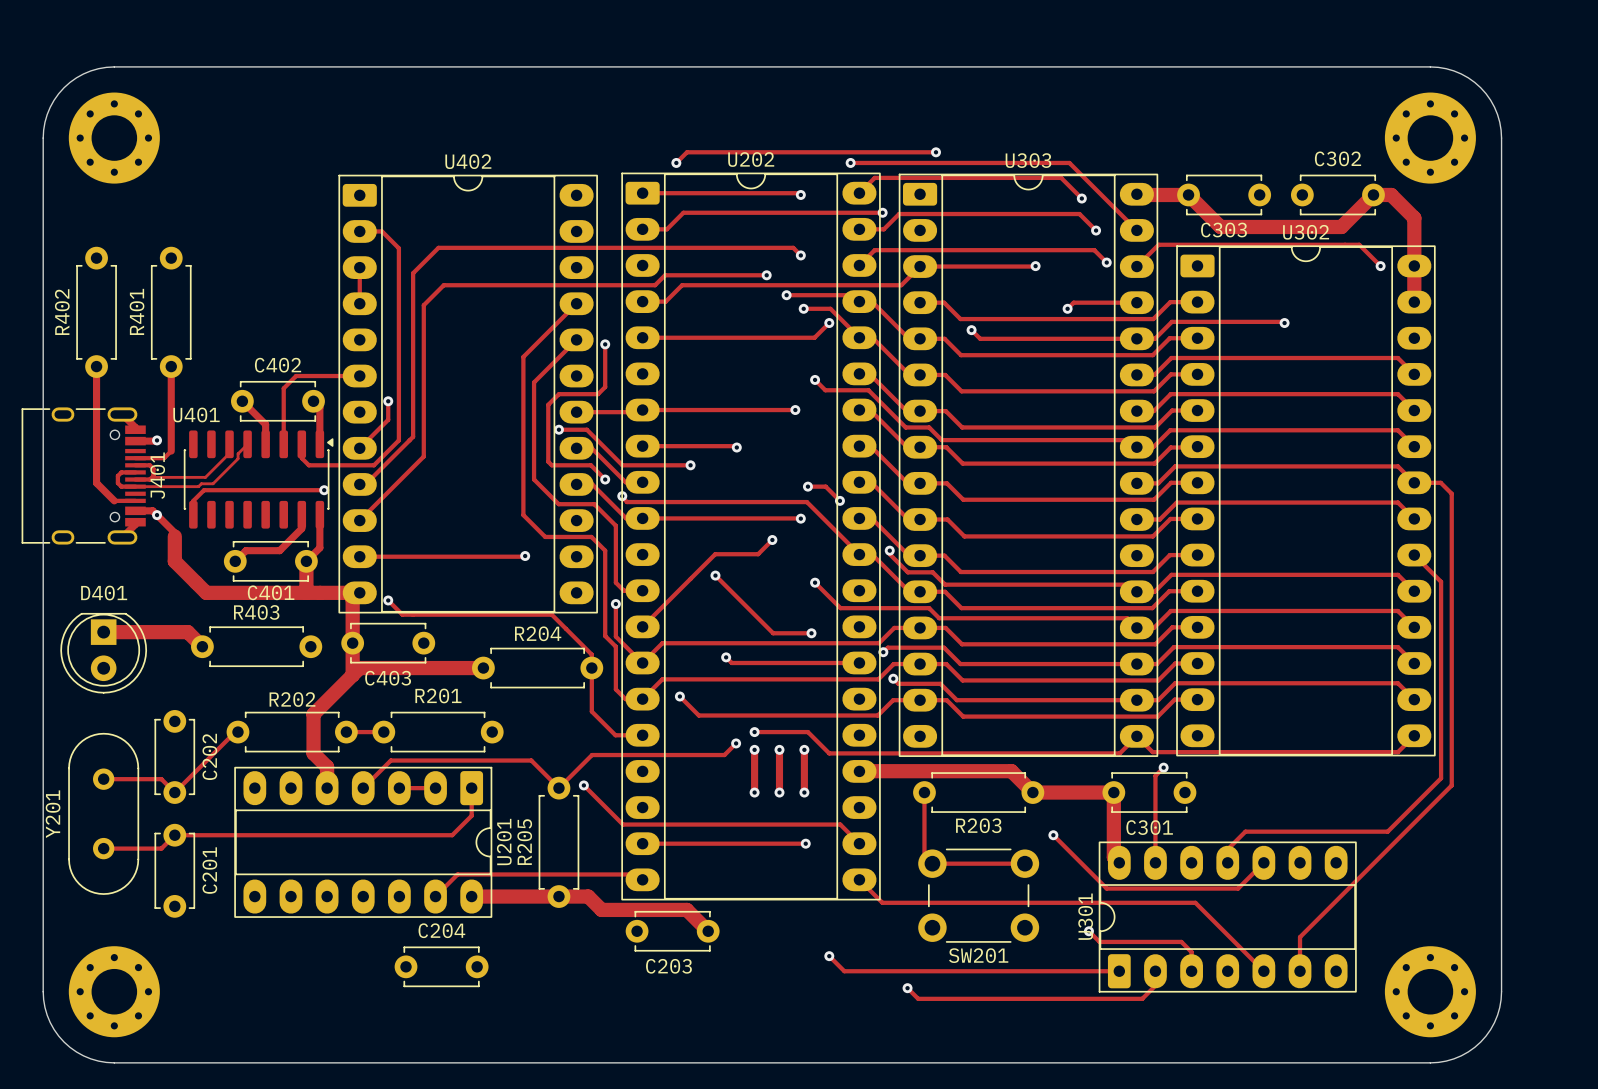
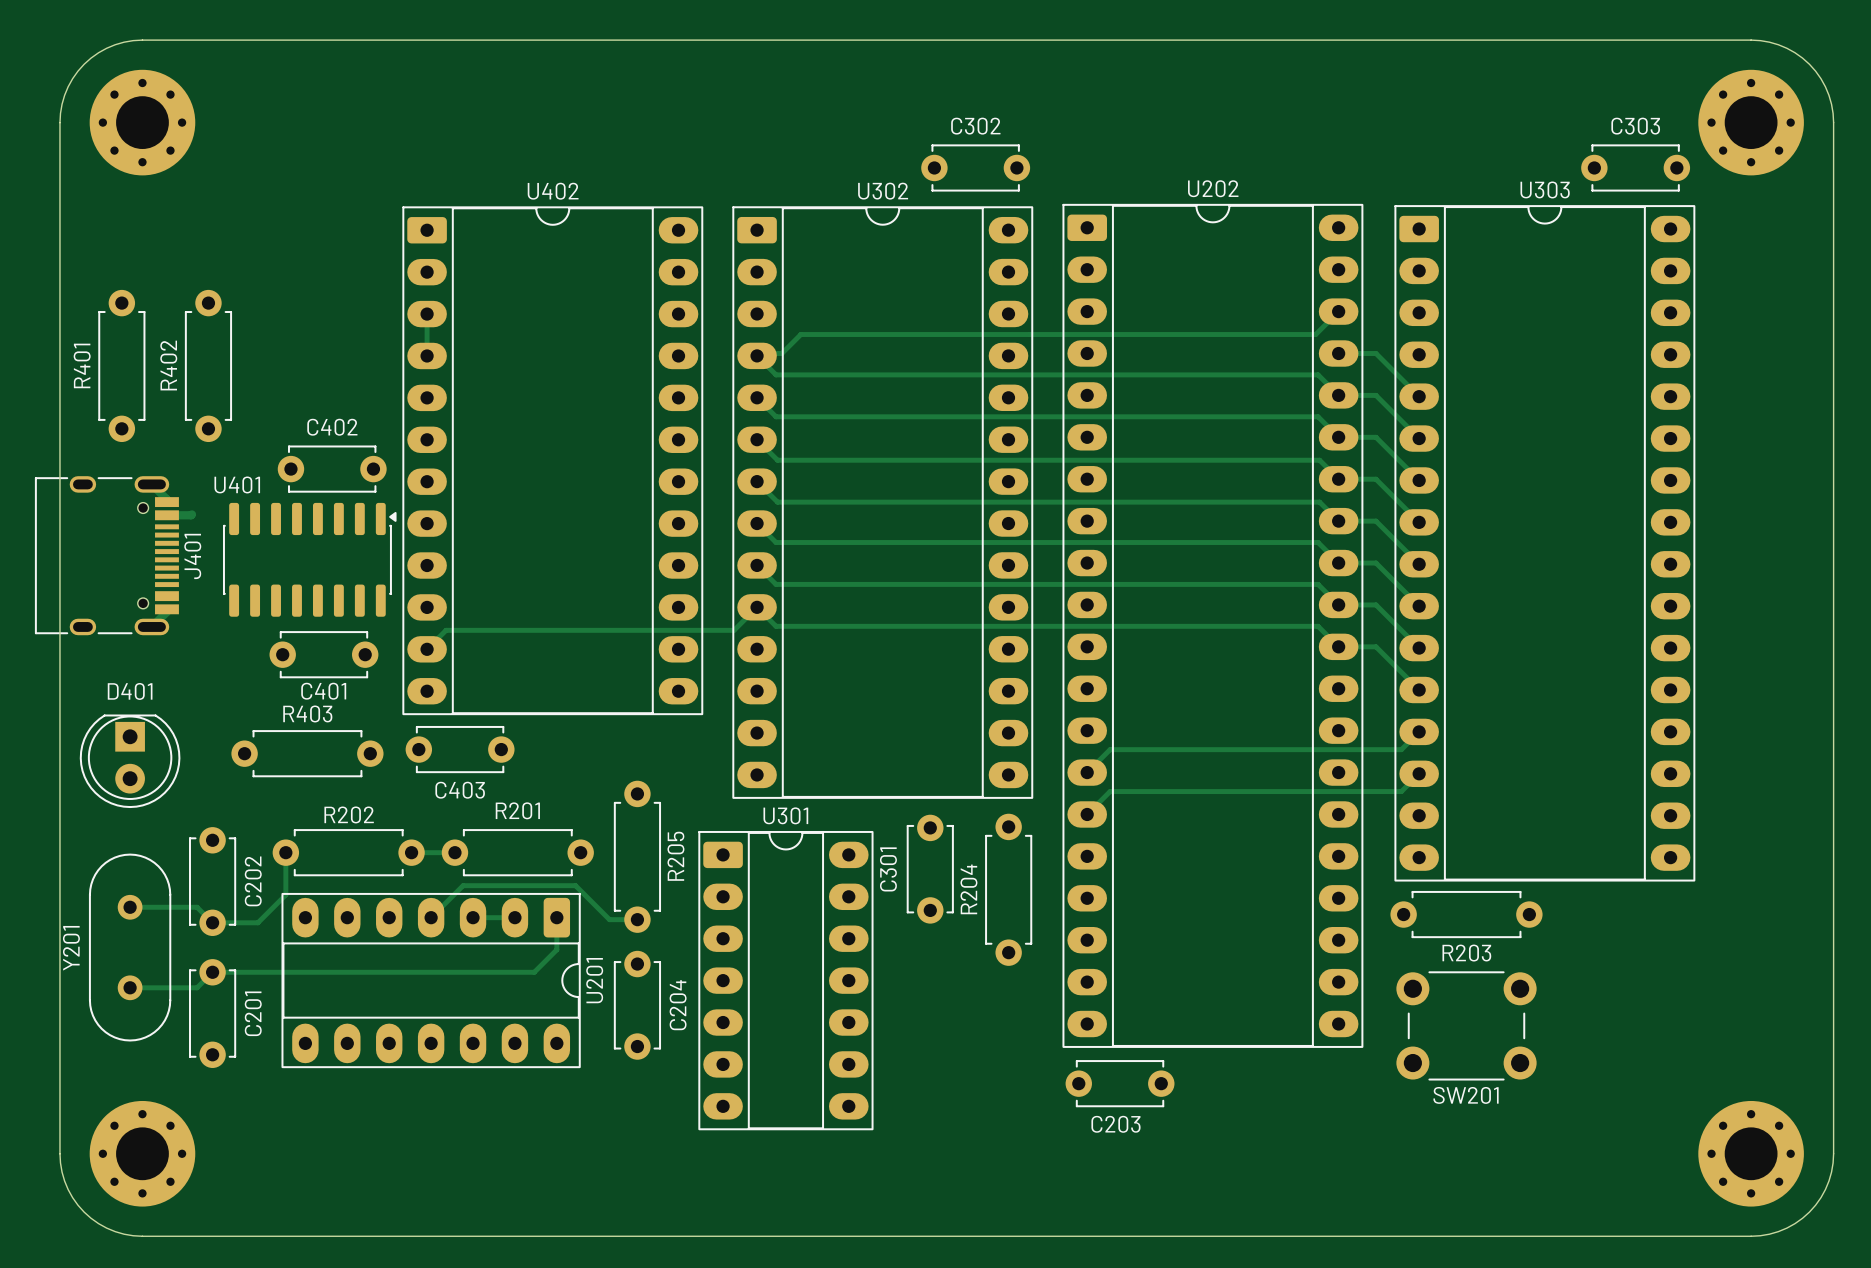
board edge: (43, 138) (44, 122) (50, 107) (64, 87) (83, 73) (98, 68) (114, 66) (1430, 66) (1446, 68) (1468, 77) (1486, 93) (1494, 107) (1499, 122) (1501, 138) (1501, 991) (1497, 1015) (1490, 1029) (1480, 1042) (1461, 1055) (1446, 1061) (1430, 1062) -> (59, 163) (60, 113) (64, 95) (72, 78) (84, 64) (98, 52) (115, 44) (133, 40) (1751, 40) (1769, 42) (1795, 52) (1809, 64) (1820, 78) (1828, 95) (1833, 122) (1833, 1163) (1828, 1181) (1820, 1197) (1802, 1218) (1786, 1228) (1760, 1235) (1668, 1236)
part position: (114, 138) -> (142, 122)
part position: (1430, 138) -> (1751, 122)
track: (936, 152) (687, 152) (676, 162) -> none
via: (936, 152) -> none
via: (676, 162) -> none
track: (850, 162) (1069, 162) (1136, 230) -> none
via: (850, 162) -> none
track: (642, 193) (799, 193) (800, 194) -> none
track: (859, 193) (874, 177) (1061, 177) (1081, 198) -> none
via: (800, 194) -> none
track: (1136, 194) (1188, 194) (1220, 226) (1341, 226) (1373, 194) (1391, 194) (1414, 218) (1414, 302) -> none
C303 position: (1224, 194) -> (1635, 167)
C302 position: (1337, 194) -> (975, 167)
via: (1081, 198) -> none
track: (882, 212) (683, 212) (666, 229) (642, 229) -> none
via: (882, 212) -> none
track: (859, 229) (883, 229) (899, 214) (1079, 214) (1096, 230) -> none
via: (1096, 230) -> none
C303 name position: C303 (1223, 230) -> C303 (1635, 126)
track: (359, 231) (382, 231) (398, 248) (398, 440) (374, 465) (308, 465) (301, 458) (301, 444) -> none
track: (800, 255) (793, 247) (438, 247) (413, 273) (413, 436) (365, 484) (359, 484) -> none
via: (800, 255) -> none
track: (1106, 262) (1094, 250) (874, 250) (859, 265) -> none
via: (1106, 262) -> none
track: (1035, 266) (920, 266) (901, 285) -> (1338, 311) (1315, 334) (1055, 334)
via: (1035, 266) -> none
track: (1380, 266) (1359, 244) (1158, 244) (1136, 266) -> none
via: (1380, 266) -> none
track: (766, 275) (665, 275) (655, 285) (443, 285) (423, 305) (423, 456) (359, 520) -> none
via: (766, 275) -> none
track: (786, 295) (853, 295) (859, 301) (871, 301) (909, 338) (944, 338) (961, 355) (1152, 355) (1169, 338) (1197, 338) -> none
via: (786, 295) -> none
track: none -> (1338, 353) (1376, 353) (1419, 396)
track: (1136, 302) (1073, 302) (1067, 308) -> none
track: (1197, 302) (1170, 302) (1153, 319) (960, 319) (944, 302) (920, 302) -> none
track: (576, 303) (523, 356) (523, 515) (545, 536) (591, 536) (605, 550) (605, 636) (615, 646) (615, 689) (625, 699) (642, 699) (662, 679) (878, 679) (893, 664) (946, 664) (962, 680) (1158, 680) (1175, 663) (1197, 663) -> none
track: none -> (757, 355) (776, 374) (1318, 374) (1338, 395) (1376, 395) (1419, 438)
track: (803, 308) (830, 308) (859, 337) (872, 337) (909, 374) (945, 374) (961, 391) (1154, 391) (1170, 374) (1197, 374) -> none
via: (803, 308) -> none
via: (1067, 308) -> none
R401 name: R401 (137, 311) -> R402 (168, 365)
R402 name: R402 (62, 312) -> R401 (82, 365)
track: (829, 323) (814, 337) (642, 337) -> none
via: (829, 323) -> none
track: (1284, 323) (1171, 321) (1154, 338) (980, 338) (971, 330) -> none
via: (1284, 323) -> none
via: (971, 330) -> none
track: (576, 339) (534, 382) (534, 479) (558, 504) (594, 504) (615, 525) (615, 582) (623, 590) (642, 590) -> none
track: none -> (757, 397) (776, 416) (1318, 416) (1338, 437) (1376, 437) (1419, 480)
track: (605, 344) (605, 387) (598, 394) (558, 394) (548, 404) (548, 461) (551, 465) (590, 465) (605, 479) -> none
via: (605, 344) -> none
track: (96, 366) (96, 483) (114, 500) (135, 500) -> none
track: (171, 366) (171, 451) (164, 458) (135, 458) -> none
track: (859, 373) (869, 373) (906, 411) (945, 411) (962, 427) (1155, 427) (1172, 410) (1197, 410) -> none
track: (1414, 374) (1397, 358) (1171, 358) (1154, 374) (1136, 374) -> none
track: none -> (757, 439) (777, 460) (1319, 460) (1338, 479) (1376, 479) (1419, 522)
track: (359, 376) (296, 376) (283, 388) (283, 444) -> none
track: (815, 379) (825, 390) (868, 390) (905, 427) (929, 427) (941, 440) (1129, 440) (1136, 447) (1153, 447) (1170, 430) (1397, 430) (1414, 446) -> none
via: (815, 379) -> none
track: (242, 401) (265, 424) (265, 444) -> none
track: (313, 401) (319, 407) (319, 444) -> none
track: (388, 401) (388, 419) (359, 448) -> none
via: (388, 401) -> none
track: (795, 410) (576, 412) -> none
via: (795, 410) -> none
track: (859, 410) (870, 410) (907, 447) (946, 447) (962, 463) (1154, 463) (1170, 447) (1197, 446) -> none
track: (1414, 410) (1397, 394) (1170, 394) (1153, 411) (1136, 411) -> none
track: none -> (757, 481) (777, 502) (1319, 502) (1338, 521) (1376, 521) (1419, 564)
track: (558, 429) (586, 429) (622, 465) (690, 465) -> none
via: (558, 429) -> none
via: (157, 440) -> none
track: (229, 444) (229, 453) (205, 477) (153, 477) (150, 479) (135, 479) (149, 479) (153, 475) (153, 468) (149, 465) (135, 465) -> none
track: (247, 444) (238, 453) (238, 458) (213, 483) (201, 483) (198, 486) (121, 486) (117, 483) (117, 475) (121, 472) (135, 472) -> none
track: (642, 446) (736, 447) -> none
track: (859, 446) (870, 446) (907, 483) (946, 483) (963, 499) (1154, 499) (1171, 482) (1197, 482) -> none
via: (736, 447) -> none
track: (576, 448) (591, 448) (625, 482) (642, 482) -> none
track: none -> (757, 523) (776, 542) (1318, 542) (1338, 563) (1376, 563) (1419, 606)
via: (690, 465) -> none
U303 position: (1028, 465) -> (1544, 543)
via: (605, 479) -> none
track: (859, 482) (871, 482) (908, 519) (947, 519) (964, 536) (1152, 536) (1170, 518) (1197, 518) -> none
track: (1136, 483) (1158, 483) (1175, 466) (1397, 466) (1414, 482) (1440, 482) (1451, 493) (1451, 785) (1300, 937) (1300, 971) -> none
track: (576, 484) (592, 484) (626, 518) (800, 518) -> none
track: none -> (757, 565) (776, 584) (1318, 584) (1338, 604) (1376, 604) (1419, 648)
track: (807, 486) (825, 486) (839, 500) -> none
via: (807, 486) -> none
track: (324, 490) (204, 490) (193, 500) (193, 514) -> none
via: (324, 490) -> none
track: (622, 496) (627, 502) (806, 502) (859, 554) (872, 554) (909, 591) (945, 591) (961, 608) (1152, 608) (1169, 591) (1197, 591) -> none
via: (622, 496) -> none
via: (839, 500) -> none
U302 position: (1305, 500) -> (882, 502)
track: (135, 510) (152, 510) (174, 532) (174, 561) (206, 592) (359, 592) (352, 599) (352, 675) -> none
track: (301, 514) (301, 528) (279, 550) (245, 550) (235, 561) -> none
track: (319, 514) (319, 547) (306, 561) (306, 592) -> none
via: (157, 515) -> none
via: (800, 518) -> none
track: (859, 518) (871, 518) (908, 555) (944, 555) (960, 572) (1152, 572) (1169, 555) (1197, 555) -> none
track: (1414, 518) (1397, 502) (1176, 502) (1159, 519) (1136, 519) -> none
U202 position: (751, 536) -> (1212, 625)
track: (772, 540) (758, 554) (715, 554) (642, 626) -> none
via: (772, 540) -> none
track: (889, 550) (889, 554) (907, 572) (932, 572) (945, 584) (1129, 584) (1136, 591) (1154, 591) (1171, 574) (1397, 574) (1414, 591) -> none
via: (889, 550) -> none
track: (1414, 555) (1441, 581) (1441, 778) (1387, 831) (1245, 831) (1227, 849) (1227, 862) -> none
track: (525, 556) (359, 556) -> (1419, 689) (1376, 646) (1338, 646) (1318, 626) (776, 626) (757, 607) (734, 630) (446, 630) (427, 649)
via: (525, 556) -> none
track: (715, 575) (773, 633) (811, 633) -> none
via: (715, 575) -> none
track: (815, 582) (840, 608) (929, 608) (939, 618) (1127, 618) (1136, 627) (1153, 627) (1170, 610) (1397, 610) (1414, 627) -> none
via: (815, 582) -> none
track: (388, 600) (402, 614) (551, 614) (591, 654) (591, 711) (615, 735) (642, 735) -> none
via: (388, 600) -> none
track: (615, 604) (615, 636) (642, 663) (662, 643) (879, 643) (894, 627) (945, 627) (962, 644) (1155, 644) (1172, 627) (1197, 627) -> none
via: (615, 604) -> none
track: none -> (1419, 731) (1401, 749) (1110, 749) (1087, 772)
track: (103, 632) (187, 632) (202, 646) -> none
R204 name position: R204 (538, 633) -> R204 (968, 889)
via: (811, 633) -> none
track: (883, 652) (887, 647) (944, 647) (960, 664) (1156, 664) (1173, 647) (1397, 647) (1414, 663) -> none
via: (883, 652) -> none
track: (726, 657) (731, 663) (859, 663) -> none
via: (726, 657) -> none
track: none -> (1419, 773) (1401, 791) (1110, 791) (1087, 814)
track: (483, 668) (359, 668) (313, 714) (313, 753) (327, 767) (327, 788) -> none
R204 rotation: 0° (537, 668) -> 90° clockwise (1008, 889)
R204 position: (537, 668) -> (1008, 889)
track: (893, 678) (898, 683) (940, 683) (956, 700) (1158, 700) (1175, 683) (1397, 683) (1414, 699) -> none
via: (893, 678) -> none
track: (679, 696) (698, 715) (877, 715) (893, 700) (946, 700) (963, 716) (1157, 716) (1174, 699) (1197, 699) -> none
via: (679, 696) -> none
track: (237, 732) (235, 732) (174, 792) -> (285, 852) (285, 894) (257, 922) (212, 922)
track: (754, 732) (807, 732) (829, 753) (1119, 753) (1136, 736) (1152, 752) (1397, 752) (1414, 735) -> none
via: (754, 732) -> none
track: (736, 743) (724, 755) (592, 755) (558, 788) (531, 760) (487, 760) -> (637, 919) (609, 919) (575, 885)
via: (736, 743) -> none
track: (754, 749) (754, 792) -> none
via: (754, 749) -> none
track: (779, 749) (779, 792) -> none
via: (779, 749) -> none
track: (804, 749) (804, 792) -> none
via: (804, 749) -> none
track: (1163, 767) (1155, 775) (1155, 862) -> none
via: (1163, 767) -> none
track: (859, 771) (1011, 771) (1032, 792) (1113, 792) (1113, 857) (1119, 862) -> none
track: (583, 785) (622, 824) (840, 824) (859, 843) (866, 843) -> none
via: (583, 785) -> none
via: (754, 792) -> none
via: (779, 792) -> none
via: (804, 792) -> none
track: (924, 792) (924, 855) (932, 863) (1024, 863) -> none
R203 position: (978, 792) -> (1466, 914)
C301 rotation: 0° (1149, 792) -> 90° clockwise (930, 869)
C301 position: (1149, 792) -> (930, 869)
track: (1053, 835) (1106, 888) (1238, 888) (1263, 862) -> none
via: (1053, 835) -> none
R205 name position: R205 (524, 842) -> R205 (675, 856)
R205 position: (558, 842) -> (637, 856)
track: (642, 843) (805, 843) -> none
via: (805, 843) -> none
track: (642, 879) (637, 874) (457, 874) (435, 896) -> none
track: (859, 879) (882, 902) (1195, 902) (1263, 971) -> none
SW201 position: (978, 895) -> (1466, 1025)
track: (471, 896) (588, 896) (601, 909) (686, 909) (708, 931) -> none
U301 rotation: 0° (1227, 917) -> 90° clockwise (785, 980)
U301 position: (1227, 917) -> (785, 980)
C203 position: (672, 931) -> (1120, 1083)
track: (1088, 931) (1099, 941) (1181, 941) (1191, 952) (1191, 971) -> none
via: (1088, 931) -> none
track: (829, 956) (844, 971) (1119, 971) -> none
via: (829, 956) -> none
C204 rotation: 0° (441, 966) -> 90° clockwise (637, 1005)
C204 position: (441, 966) -> (637, 1005)
track: (1155, 971) (1155, 985) (1142, 998) (918, 998) (907, 988) -> none
via: (907, 988) -> none
part position: (1430, 991) -> (1751, 1153)

